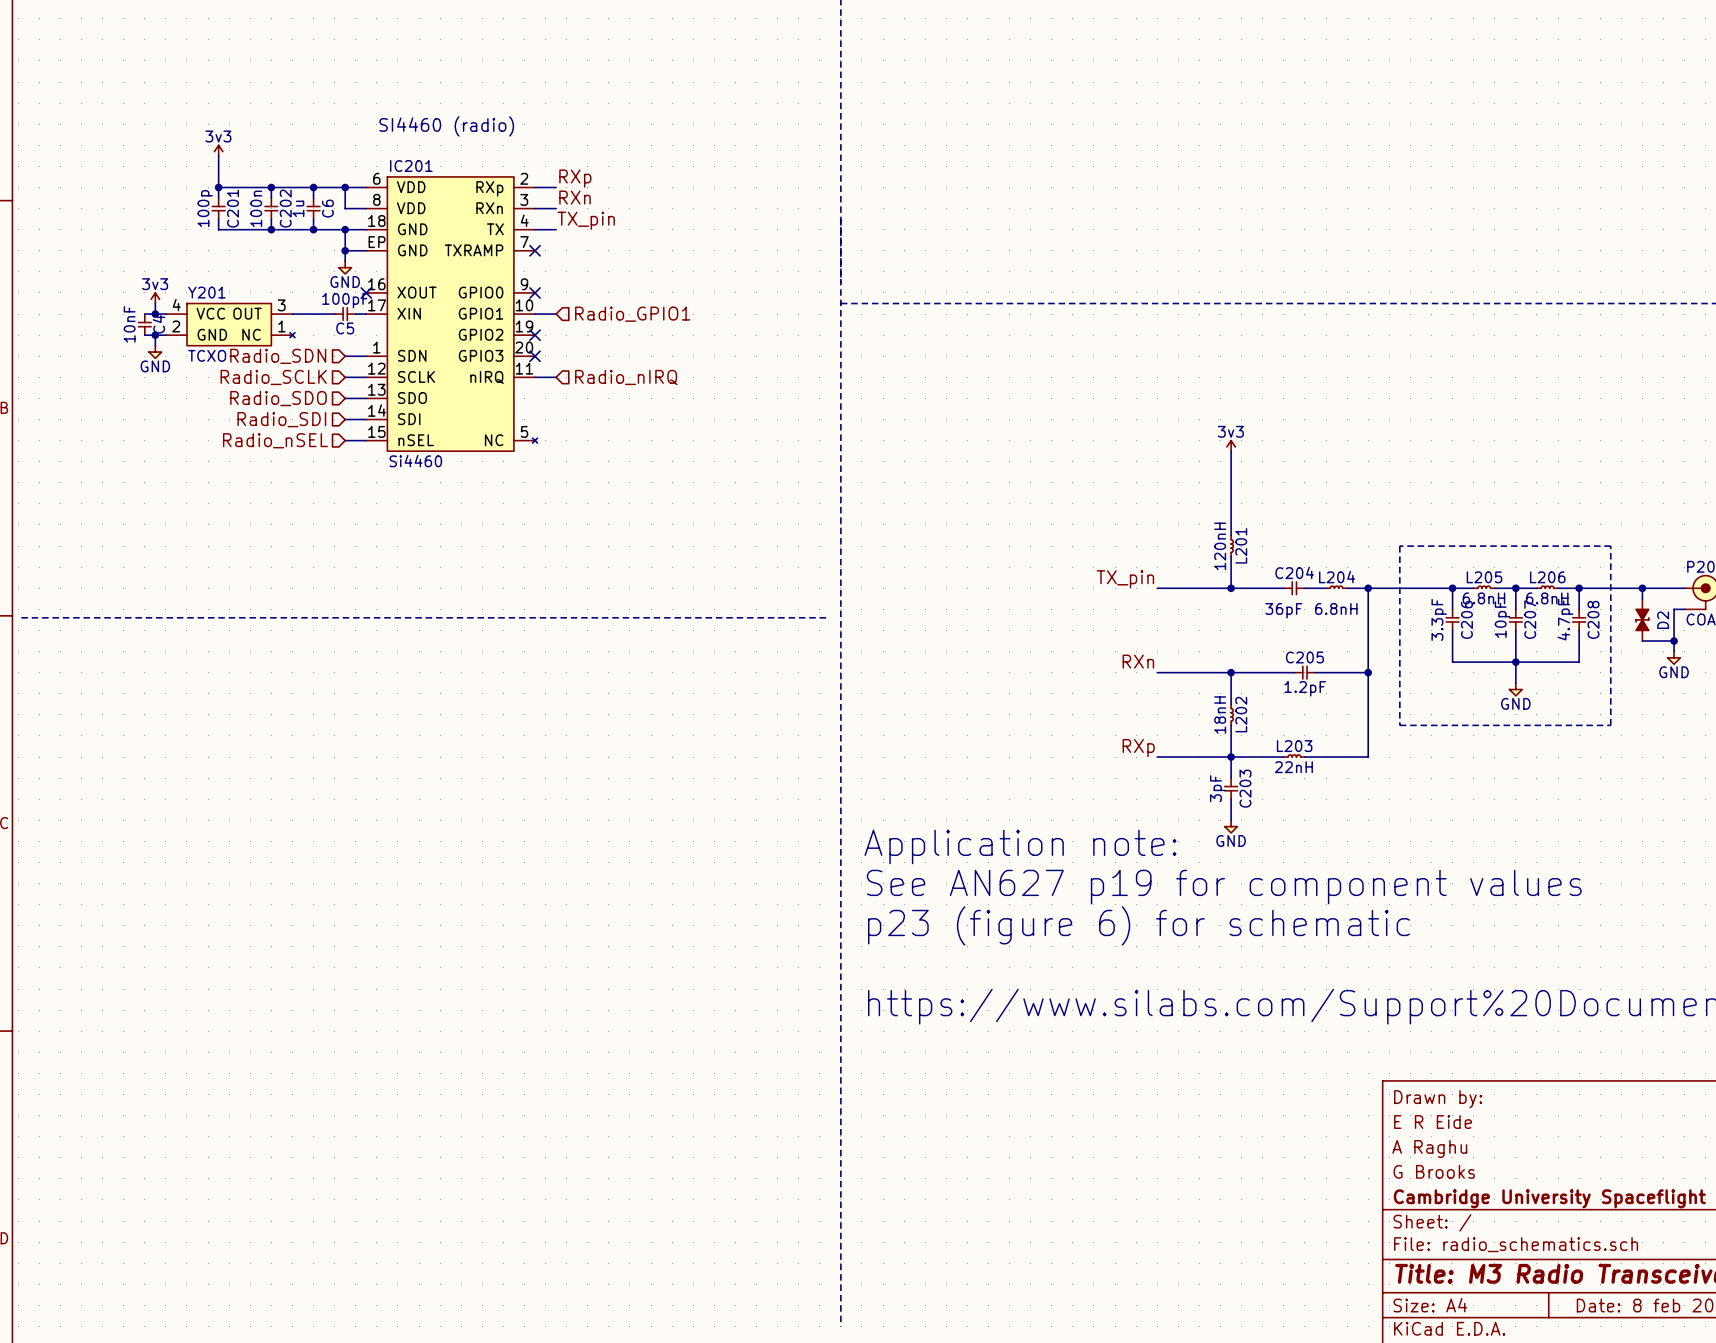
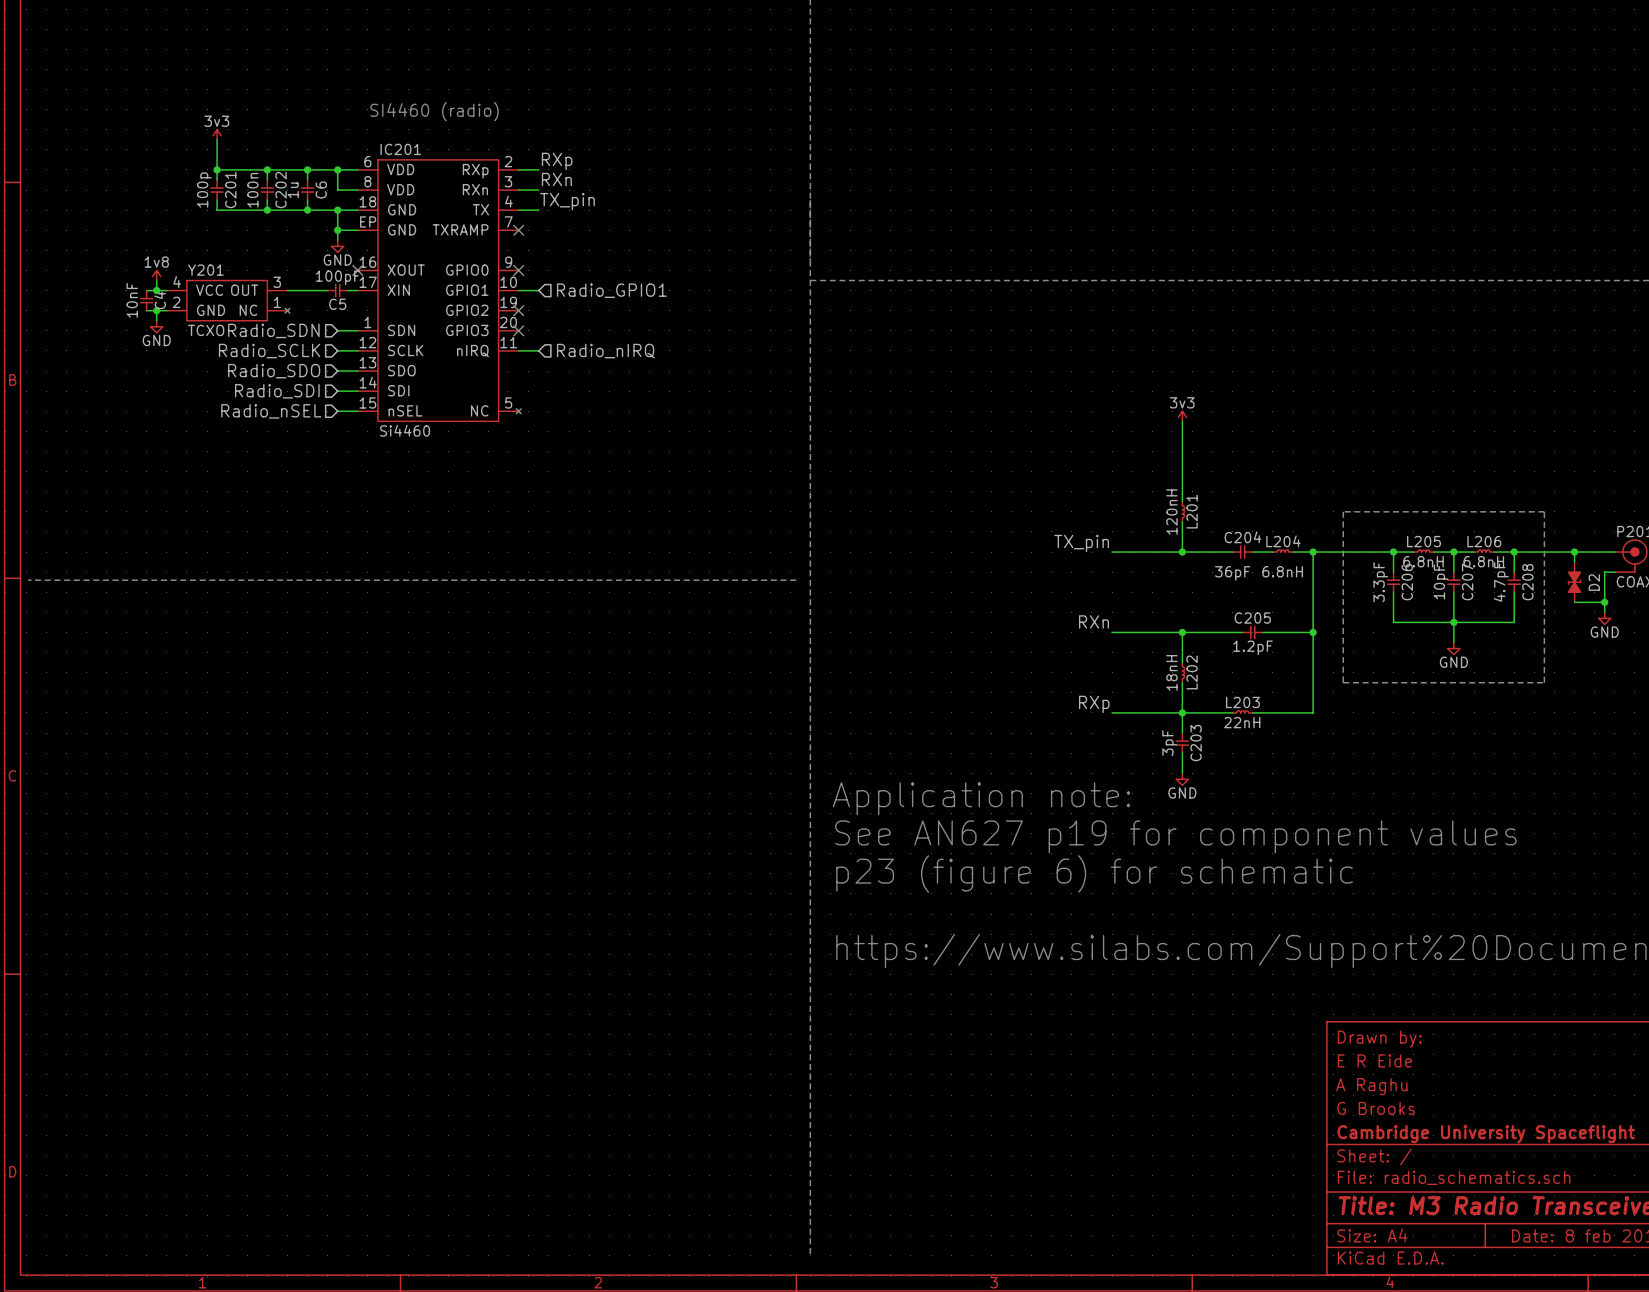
power symbol: 3v3 (155, 298) -> 1v8 (156, 275)

